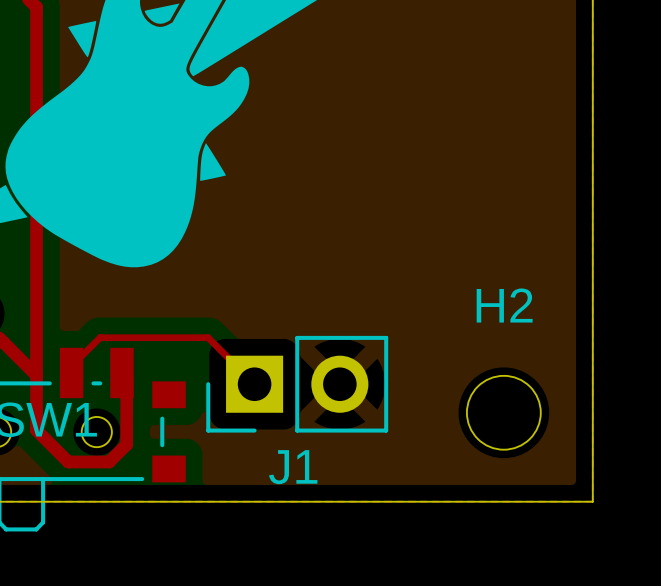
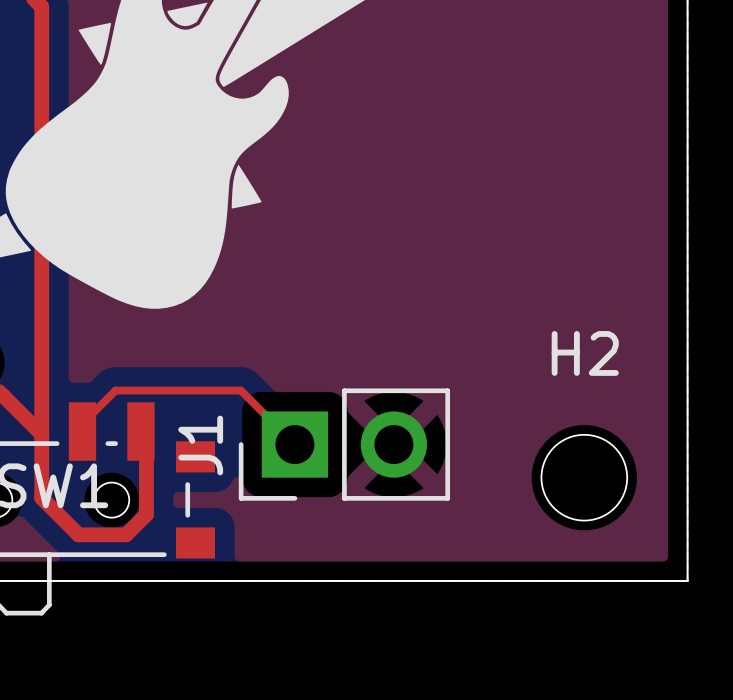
J1 name rotation: 0° (293, 467) -> 90° counterclockwise (200, 445)
J1 name position: J1 (293, 467) -> J1 (200, 445)

